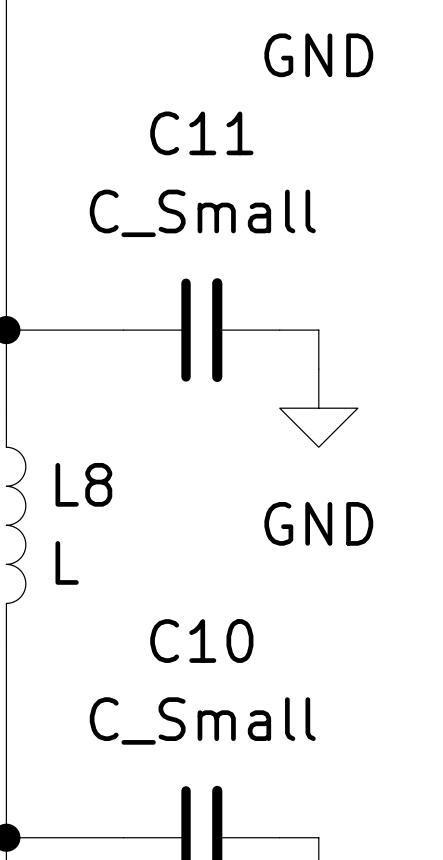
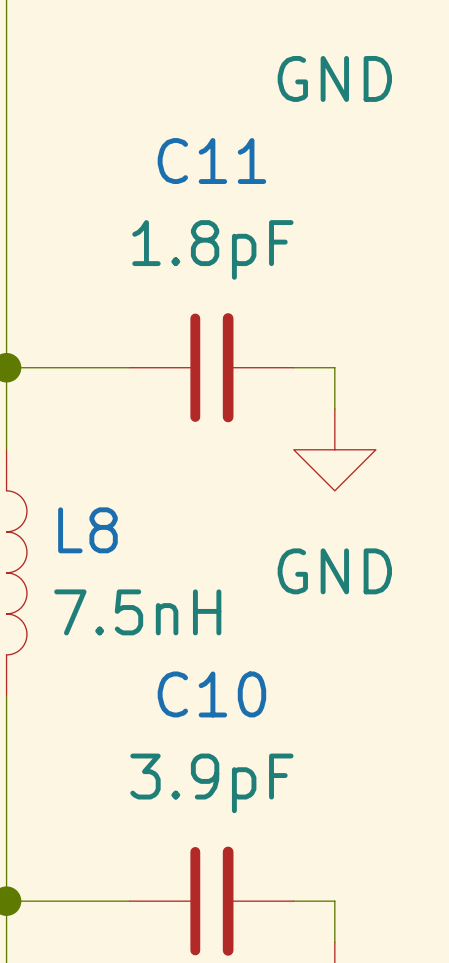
C11 value: C_Small (202, 213) -> 1.8pF (212, 249)
L8 value: L (67, 562) -> 7.5nH (137, 612)
C10 value: C_Small (202, 720) -> 3.9pF (211, 783)

